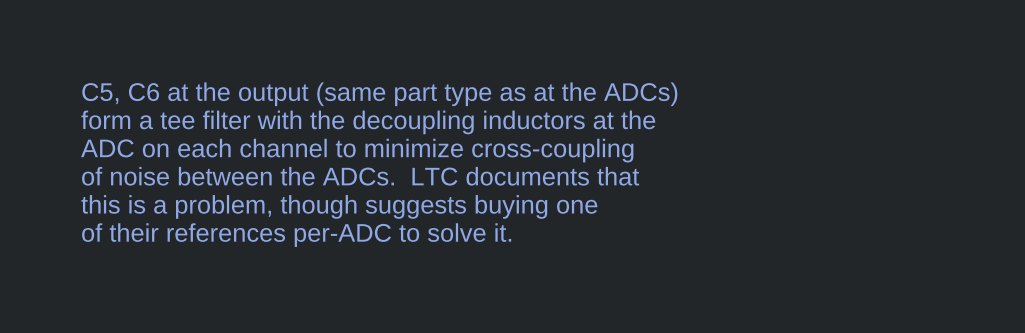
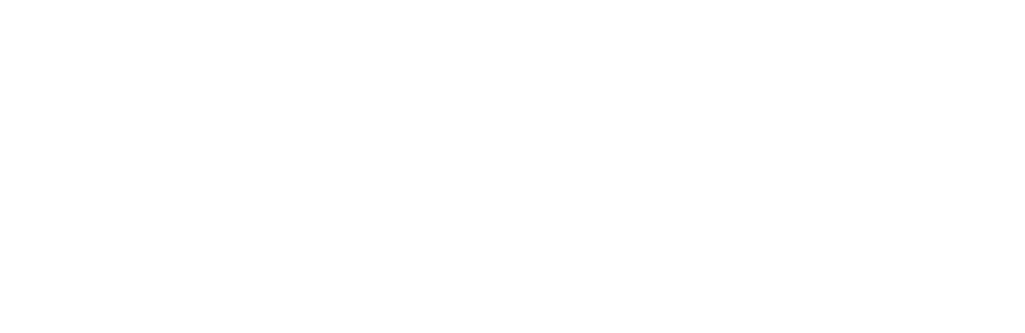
text: C5, C6 at the output (same part type as at the ADCs) (379, 94) -> none
text: form a tee filter with the decoupling inductors at the (368, 122) -> none
text: ADC on each channel to minimize cross-coupling (357, 150) -> none
text: of noise between the ADCs. LTC documents that (360, 176) -> none
text: this is a problem, though suggests buying one (339, 206) -> none
text: of their references per-ADC to solve it. (296, 235) -> none

